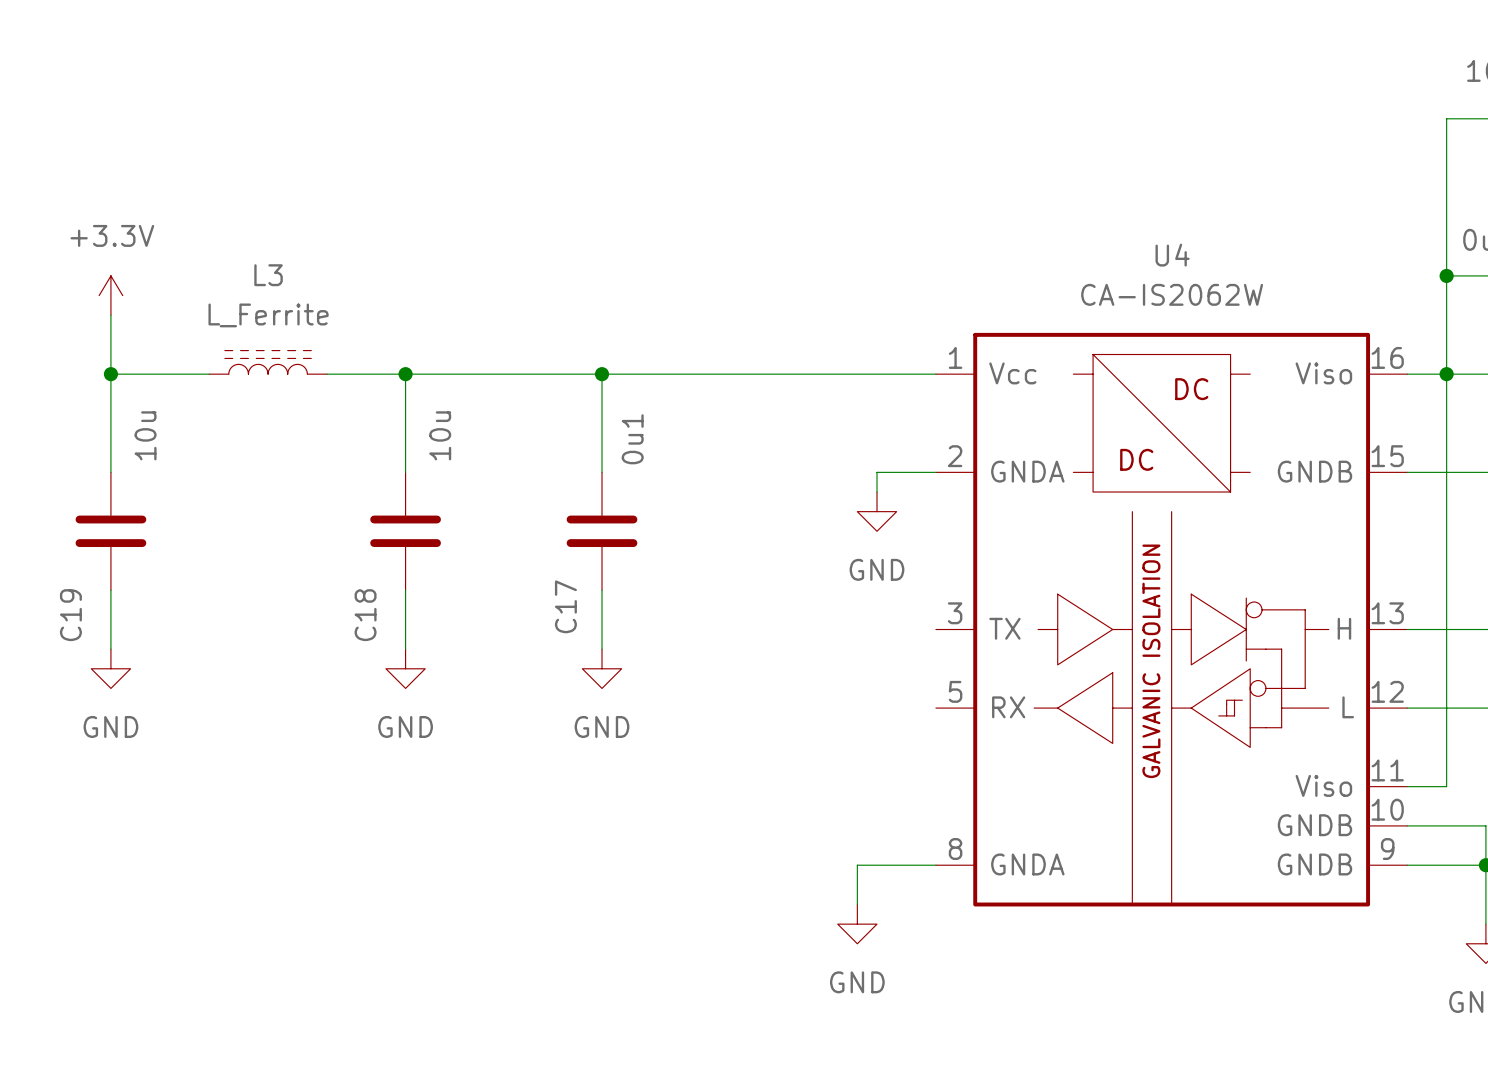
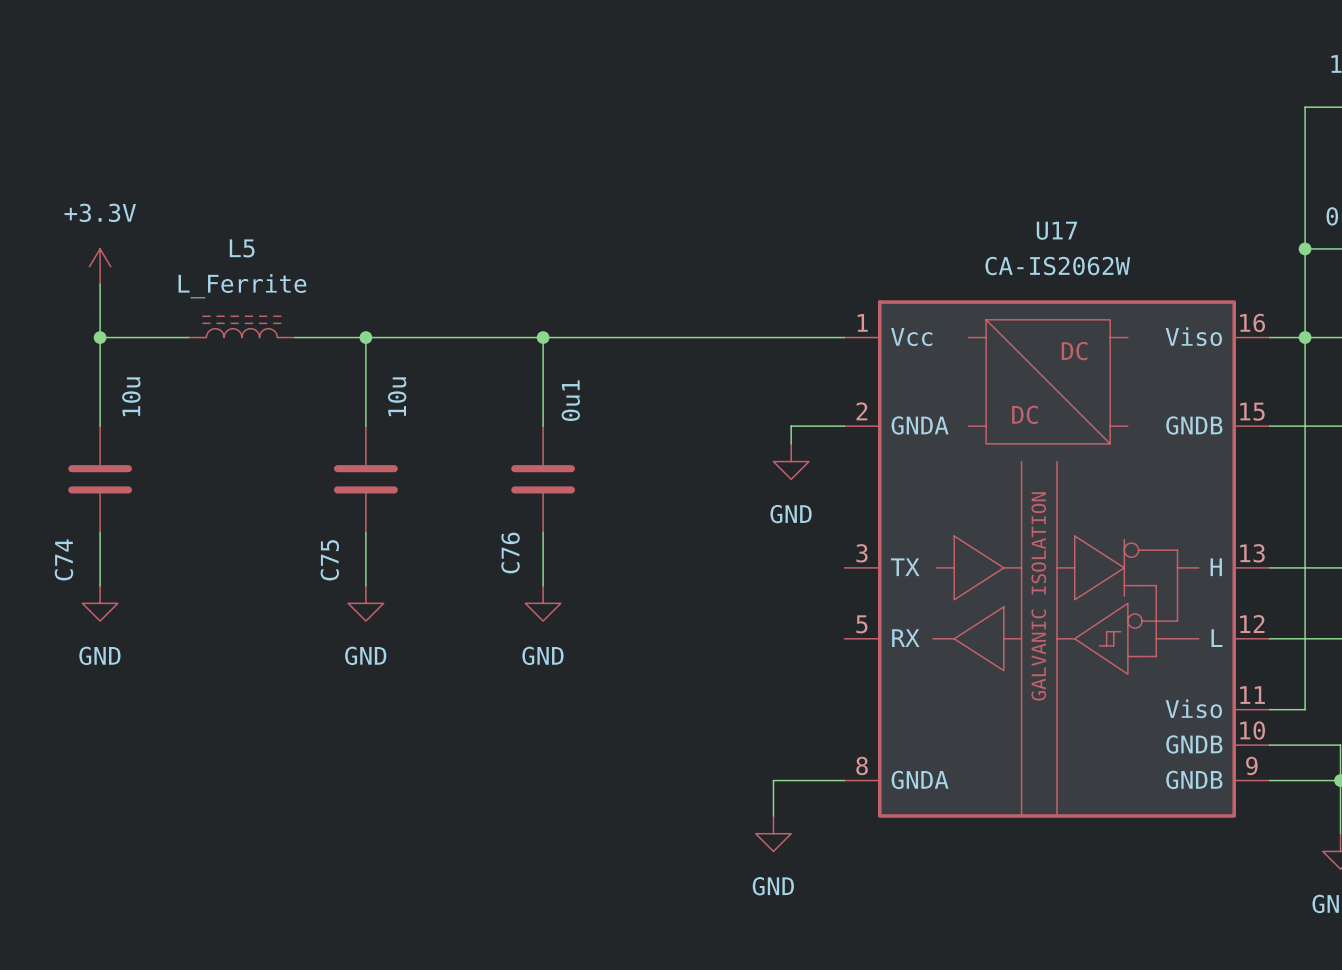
U4 name: U4 (1172, 255) -> U17 (1056, 230)
L3 name: L3 (268, 275) -> L5 (242, 248)
C17 name: C17 (565, 606) -> C76 (510, 553)
C19 name: C19 (70, 615) -> C74 (63, 559)
C18 name: C18 (365, 615) -> C75 (329, 560)

